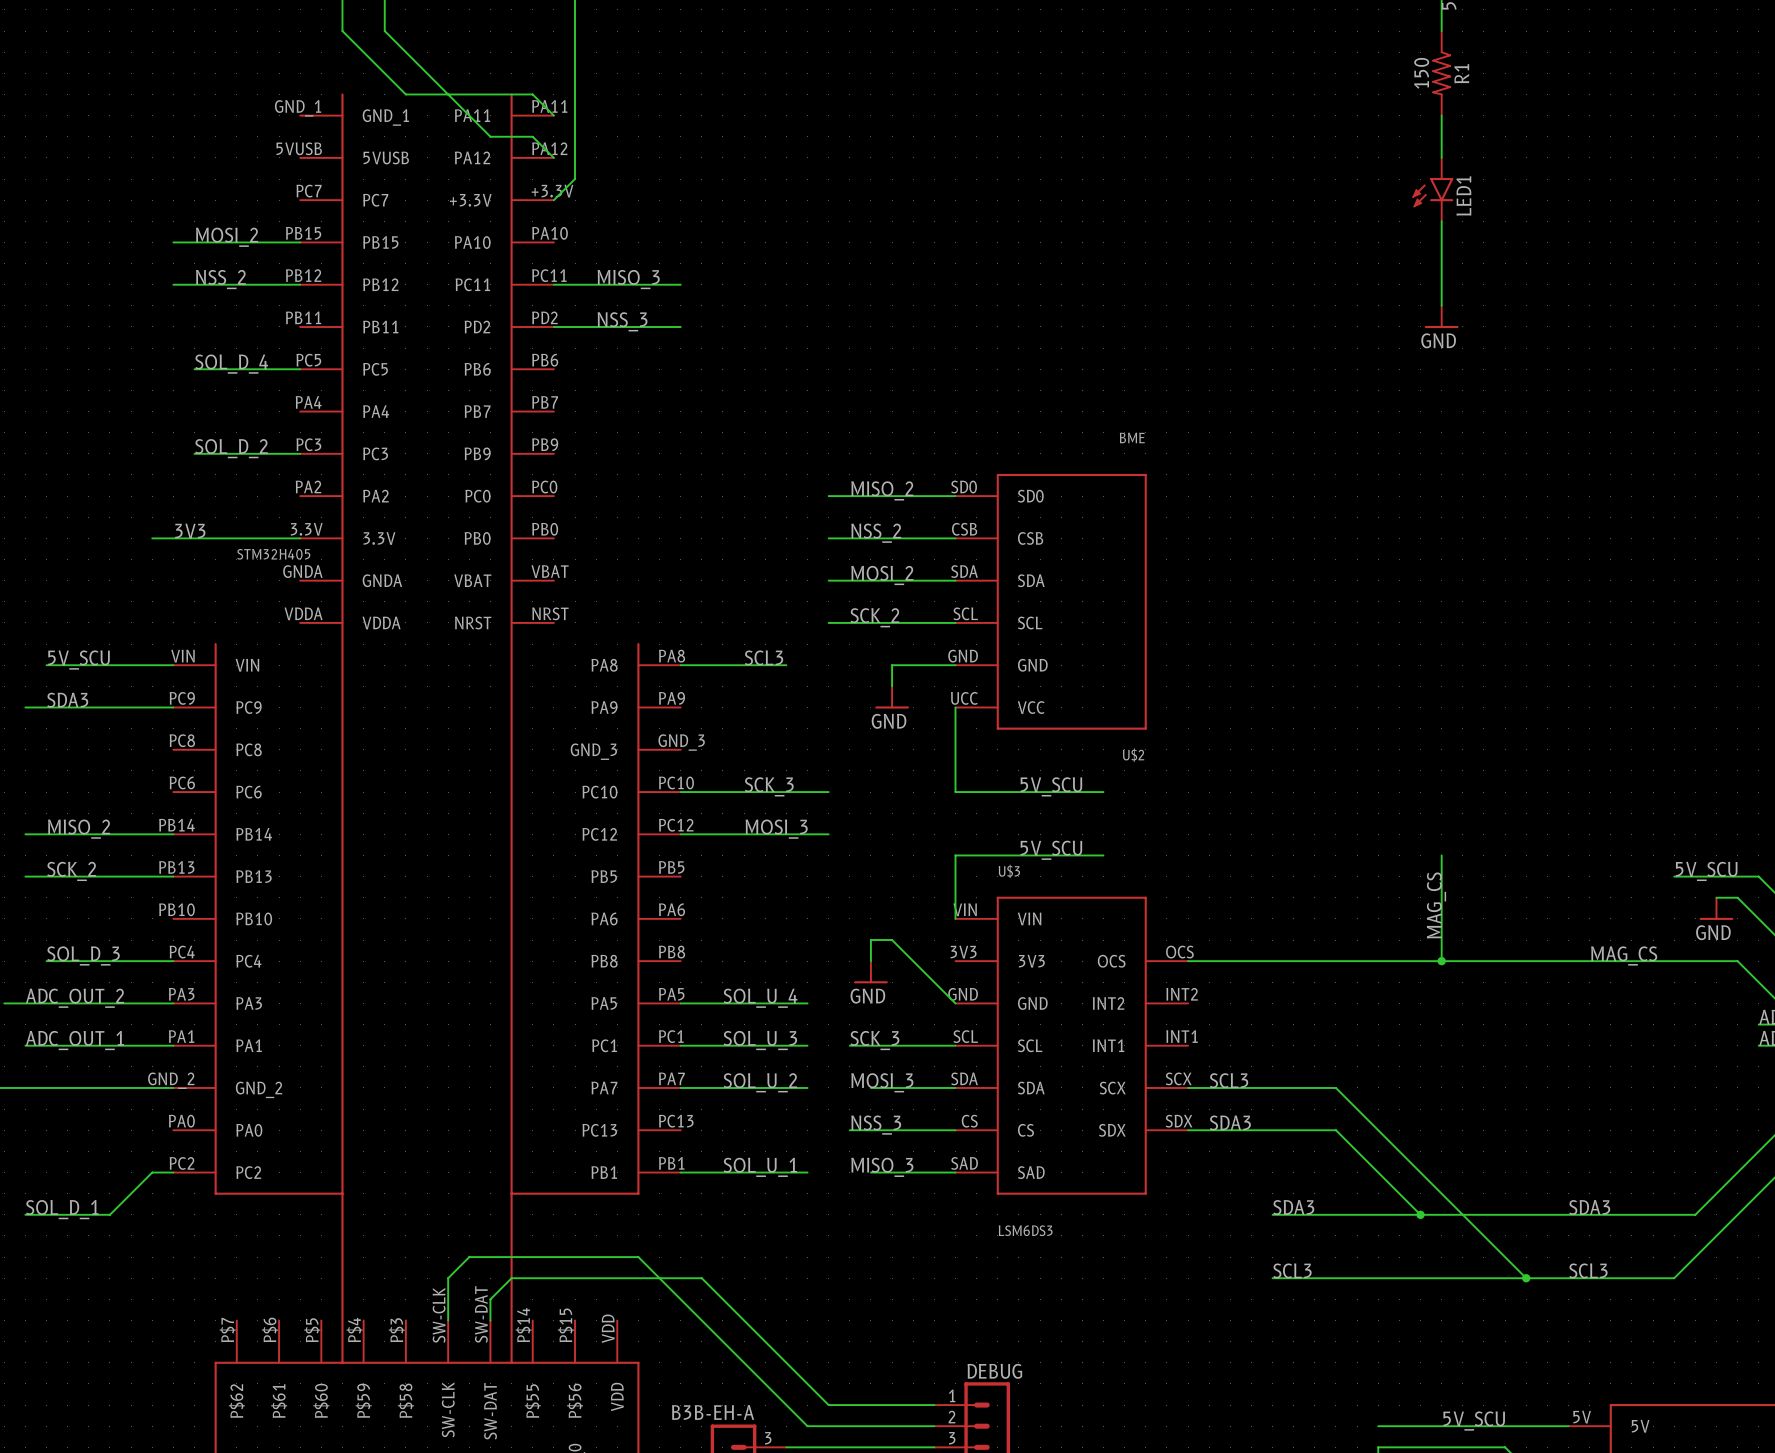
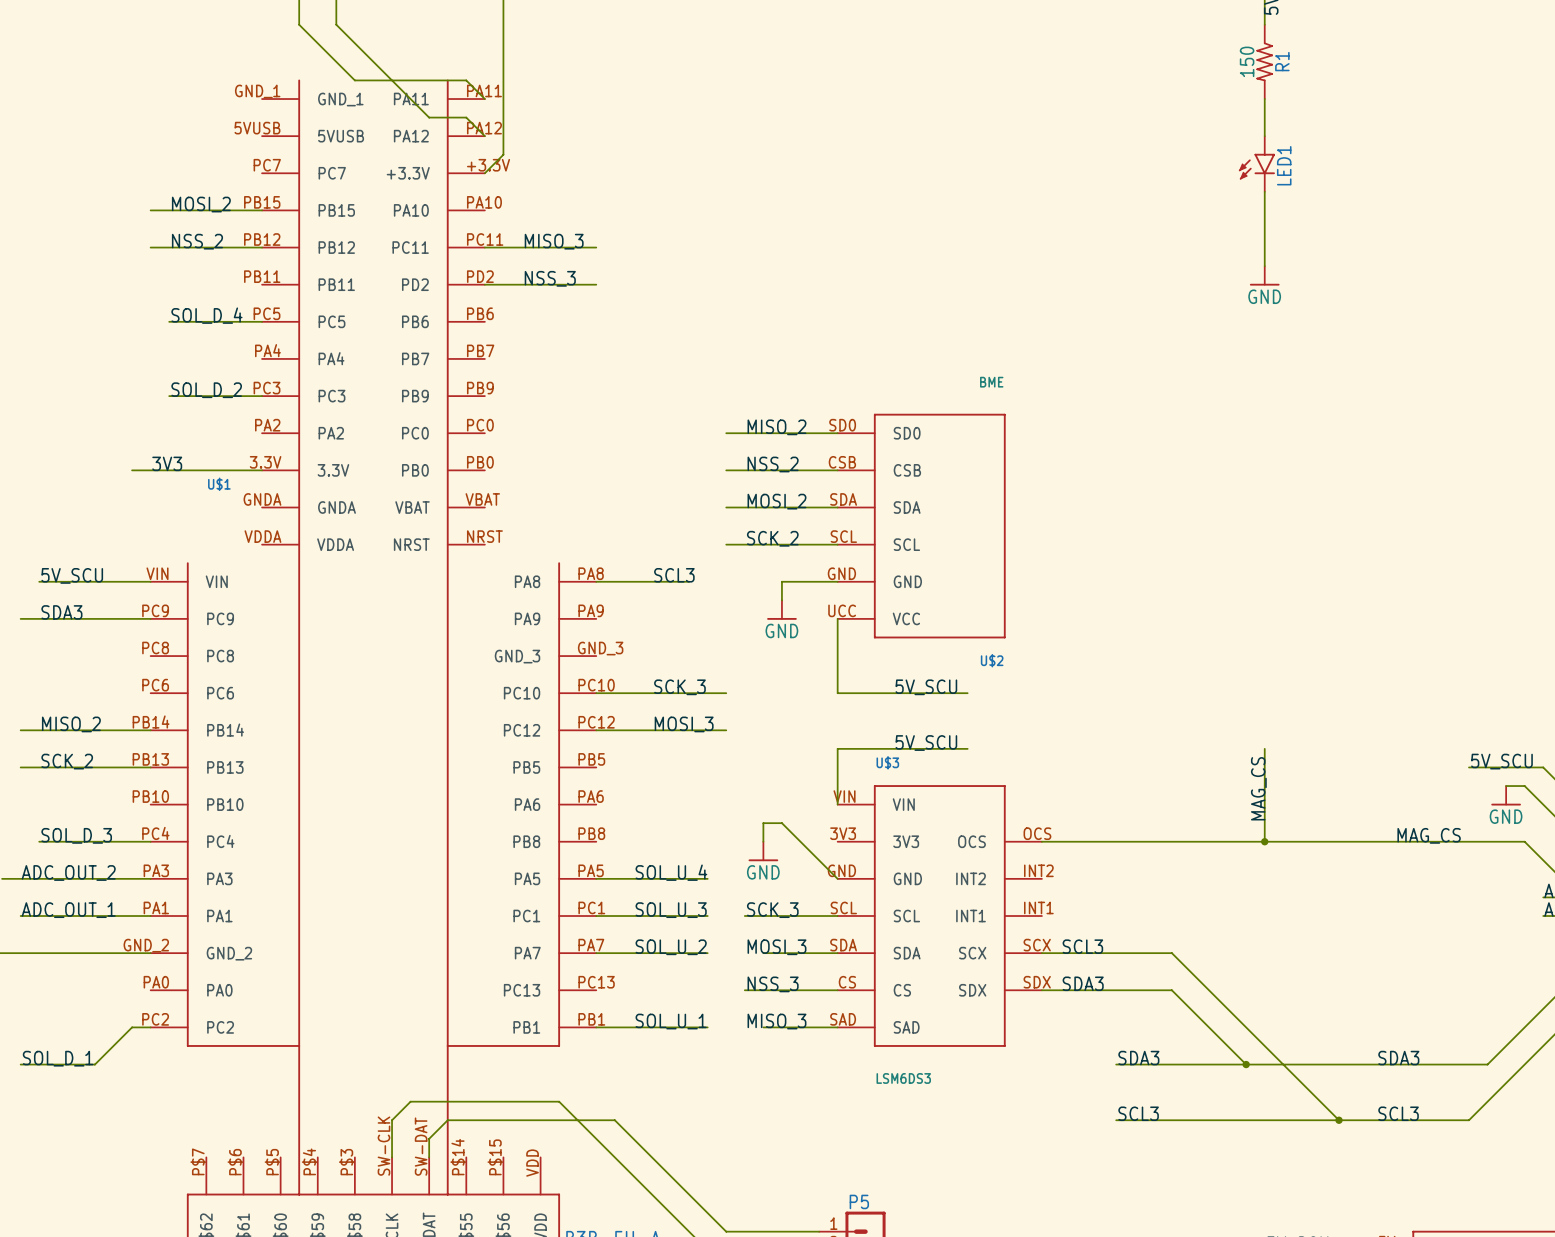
STM32H405 name: STM32H405 (273, 554) -> U$1 (219, 484)
DEBUG name: DEBUG (994, 1371) -> P5 (859, 1201)

